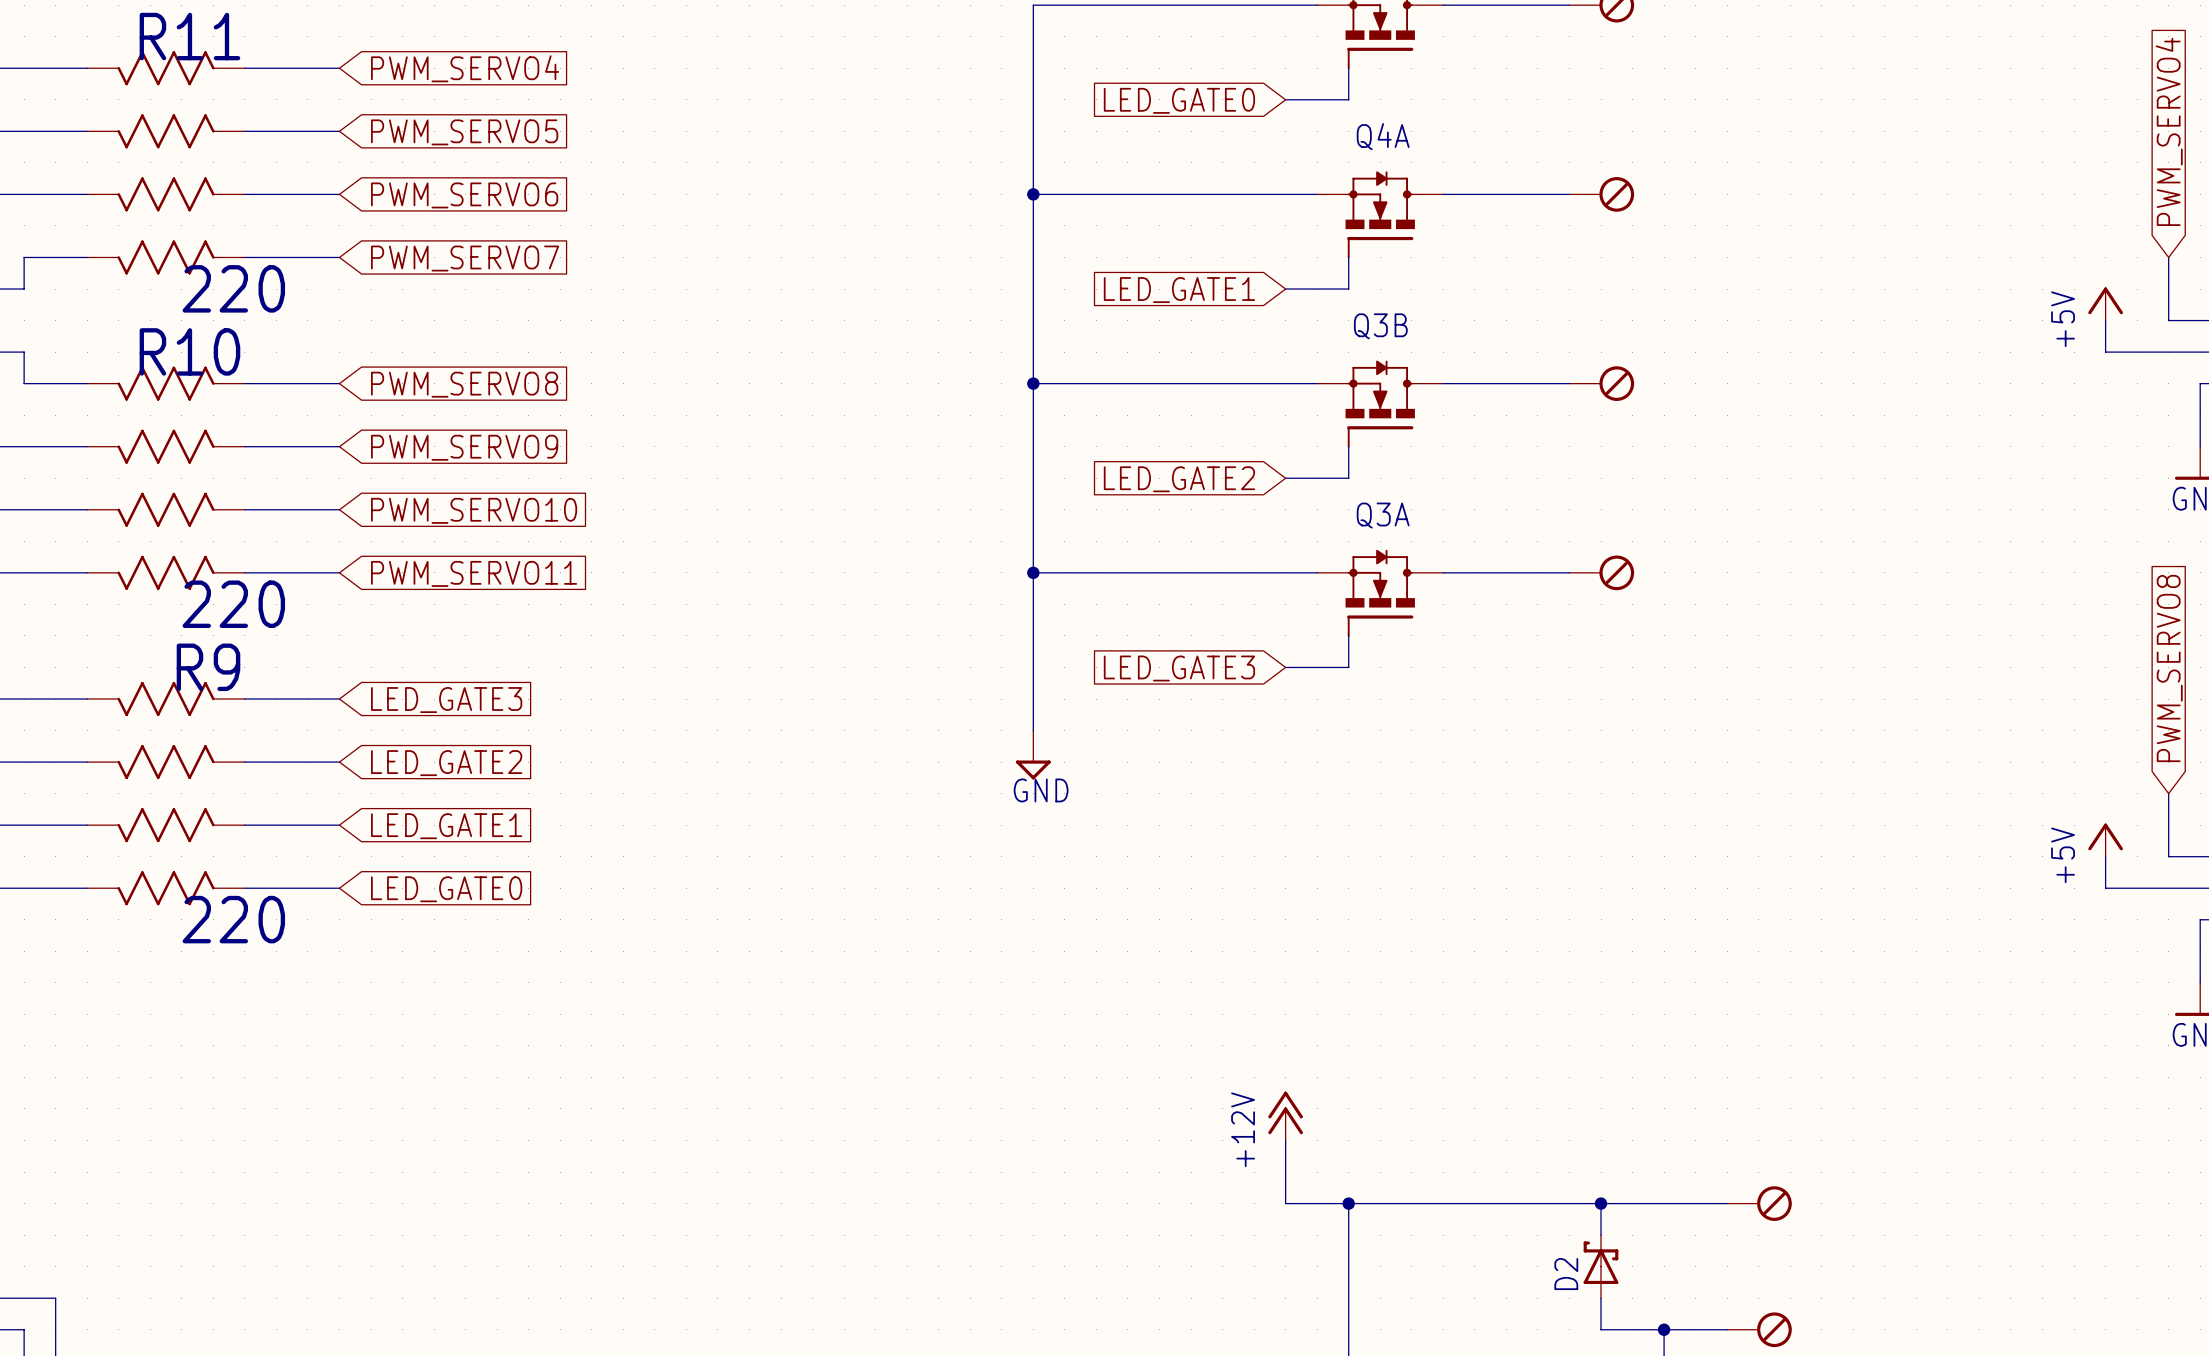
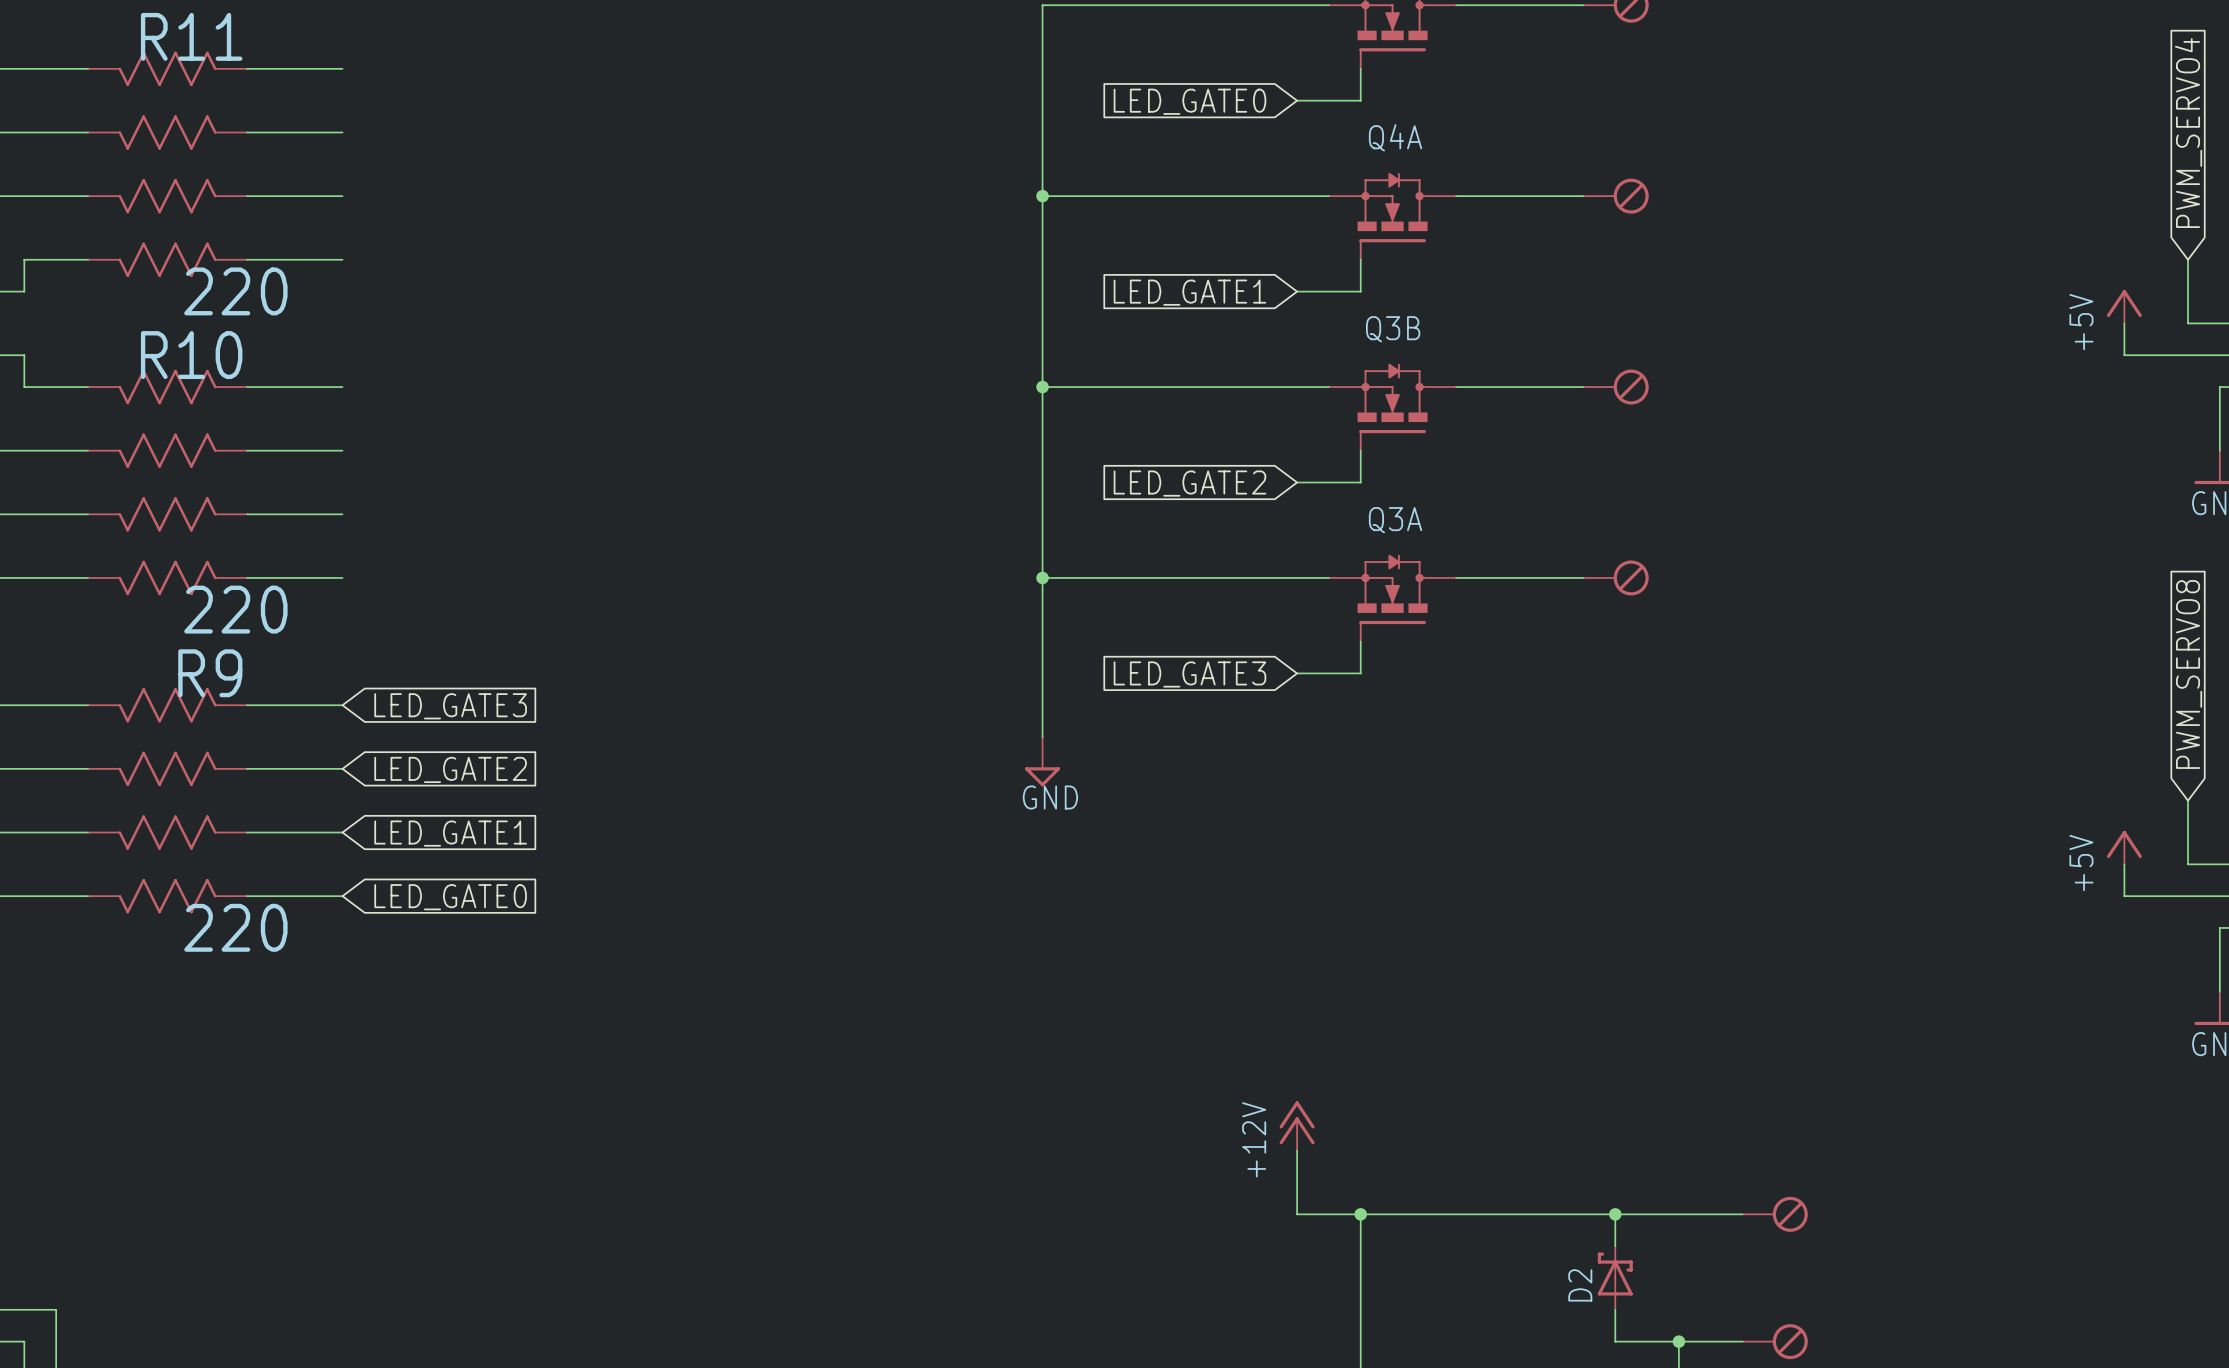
global label: PWM_SERVO4 (465, 68) -> none
global label: PWM_SERVO5 (464, 132) -> none
global label: PWM_SERVO6 (464, 195) -> none
global label: PWM_SERVO7 (465, 258) -> none
global label: PWM_SERVO8 (464, 384) -> none
global label: PWM_SERVO9 (464, 447) -> none
global label: PWM_SERVO10 (474, 510) -> none
global label: PWM_SERVO11 (474, 573) -> none

